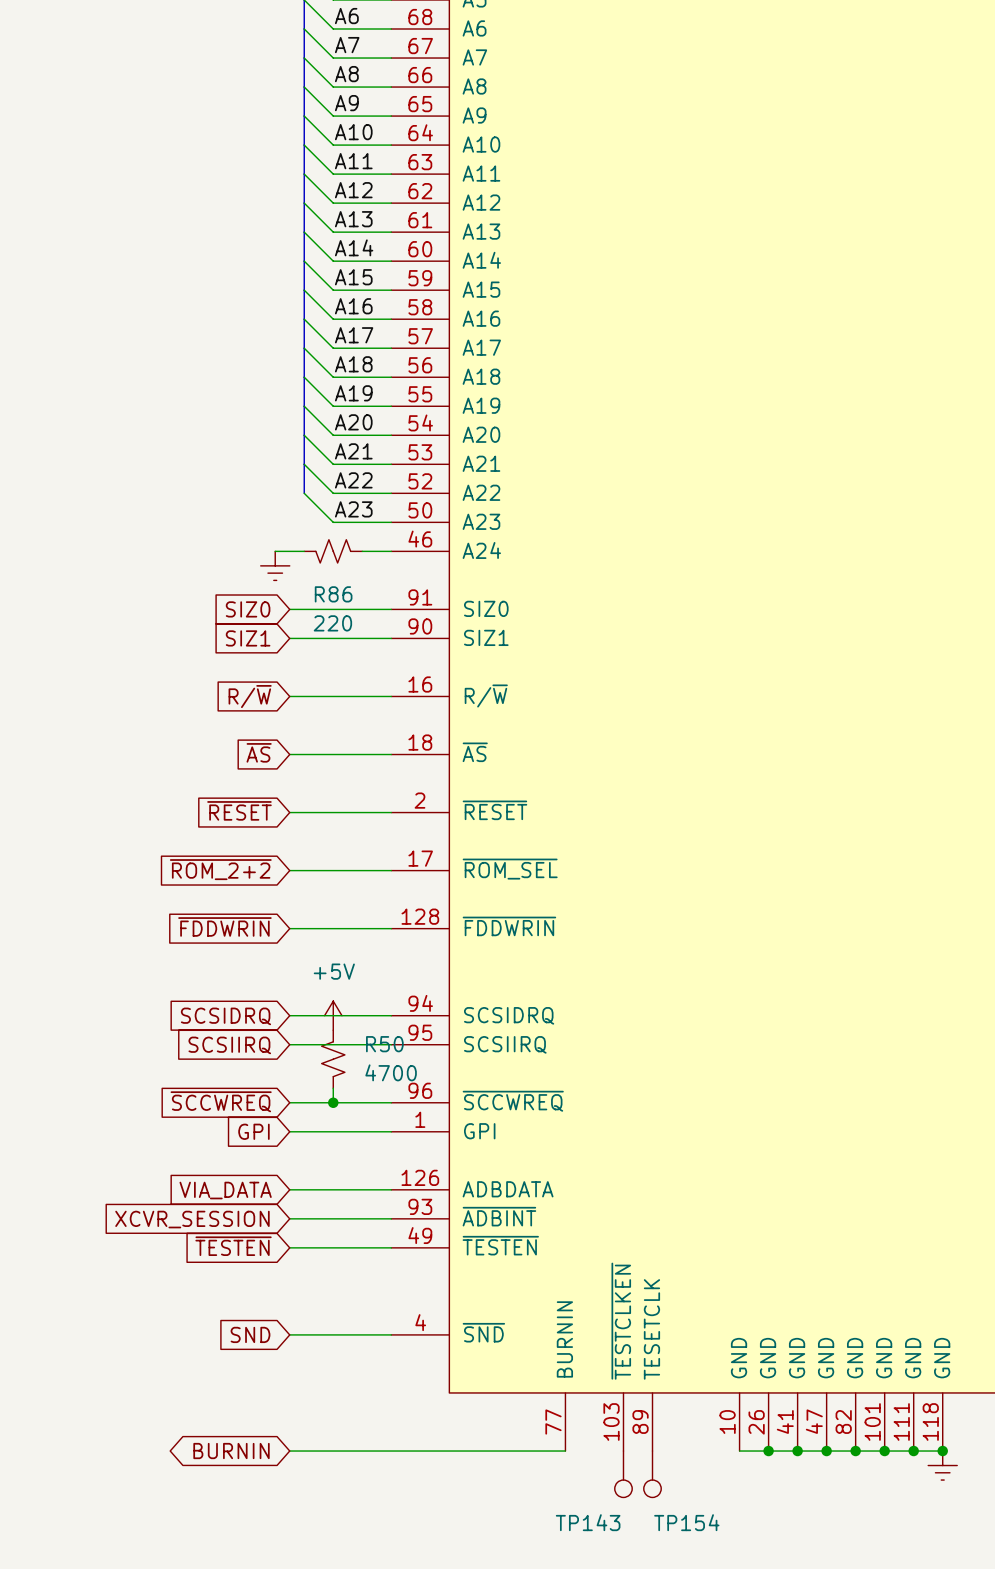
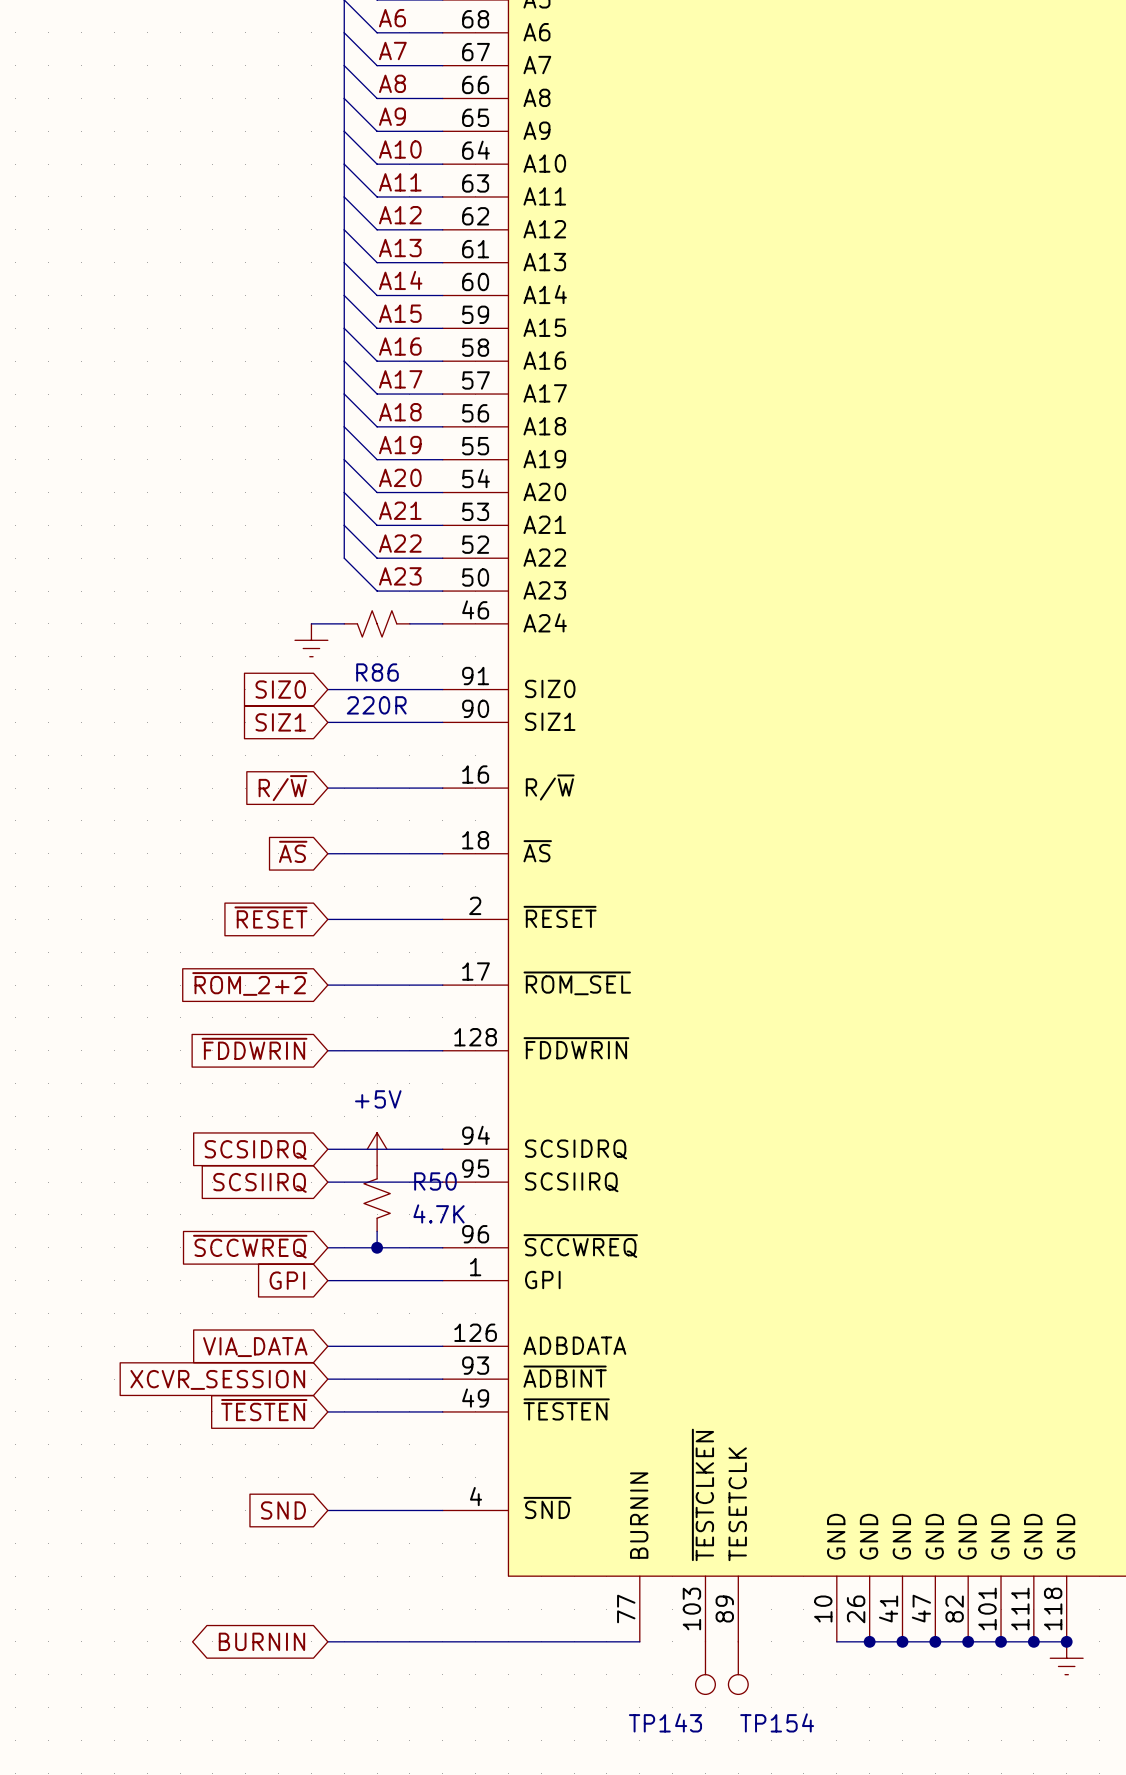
R86 value: 220 (332, 623) -> 220R (376, 705)
R50 value: 4700 (391, 1072) -> 4.7K (438, 1213)

